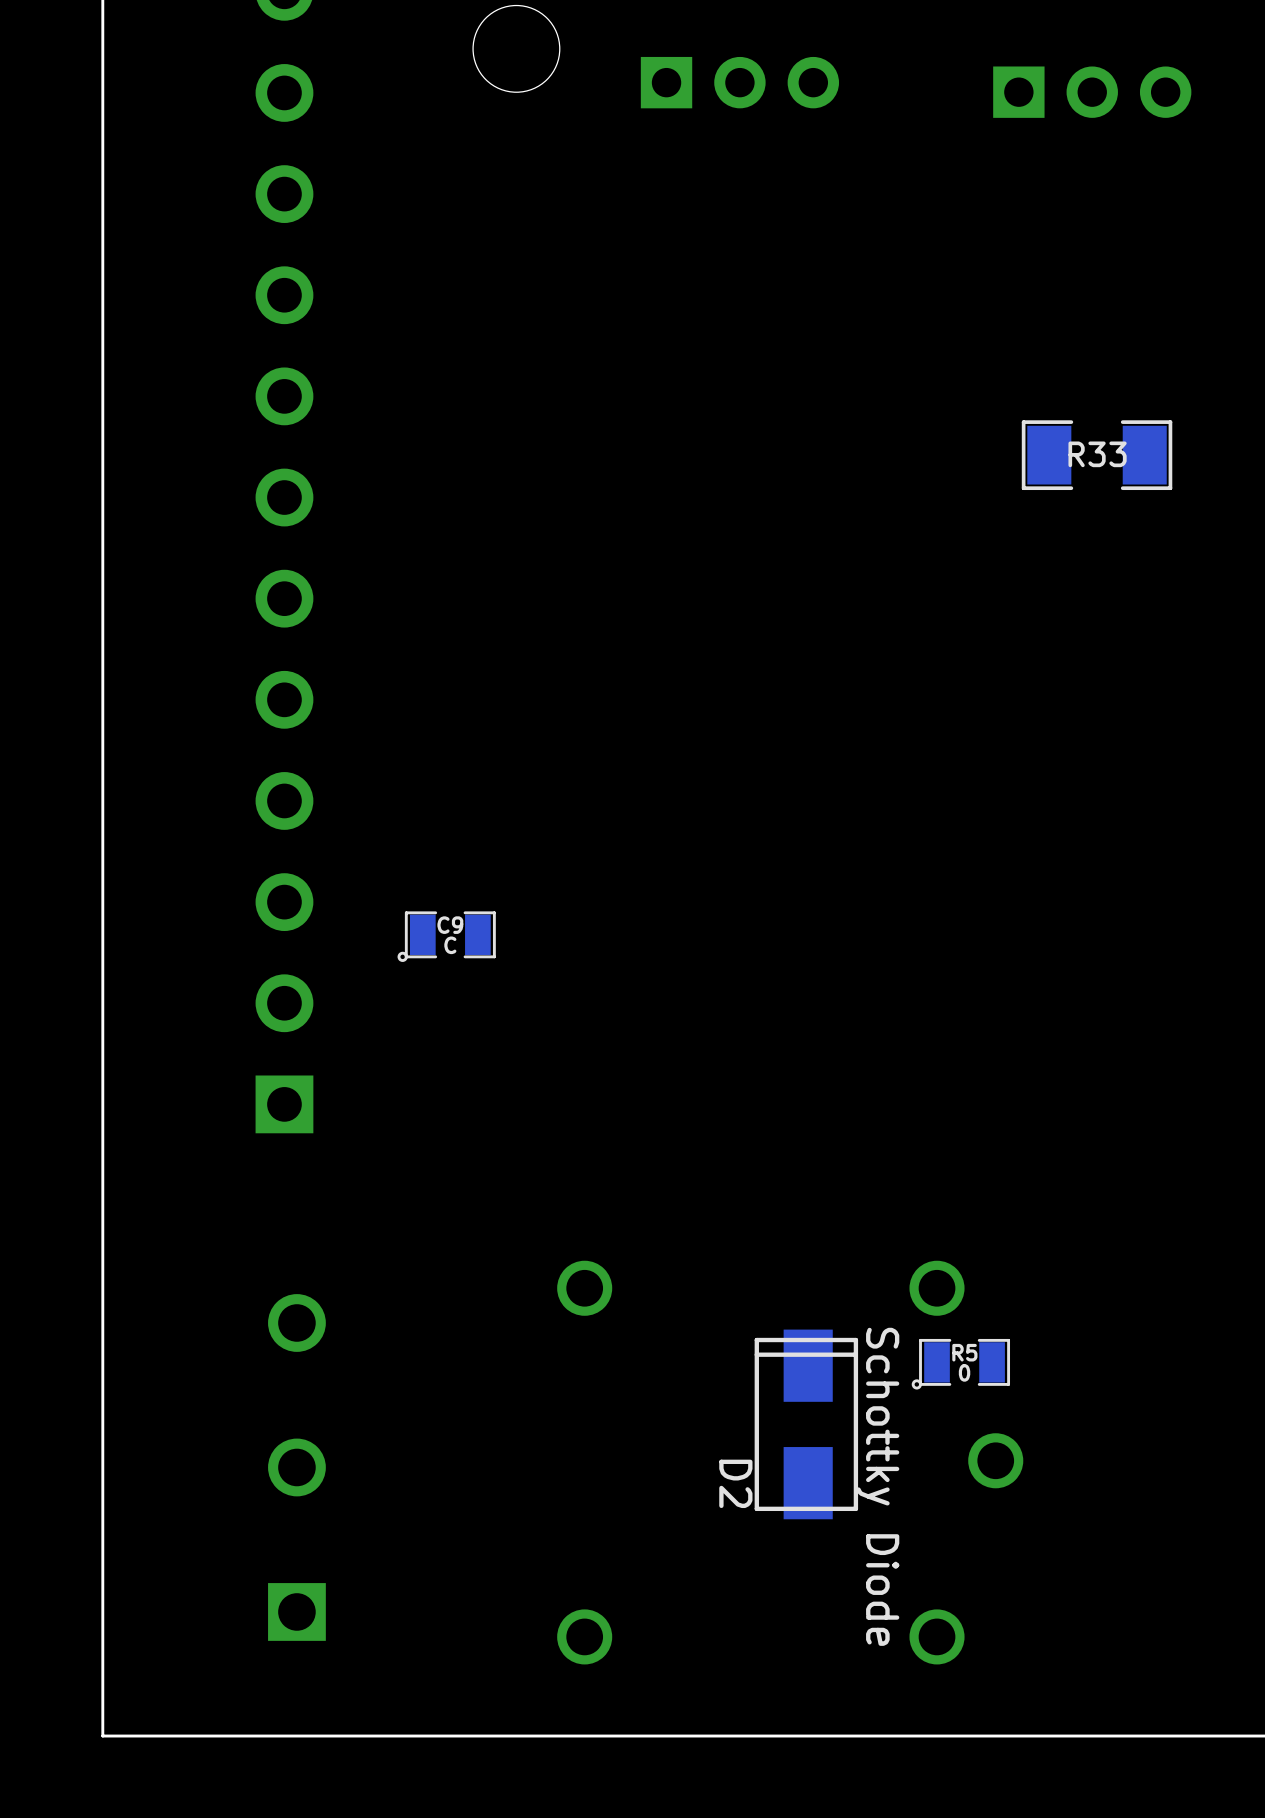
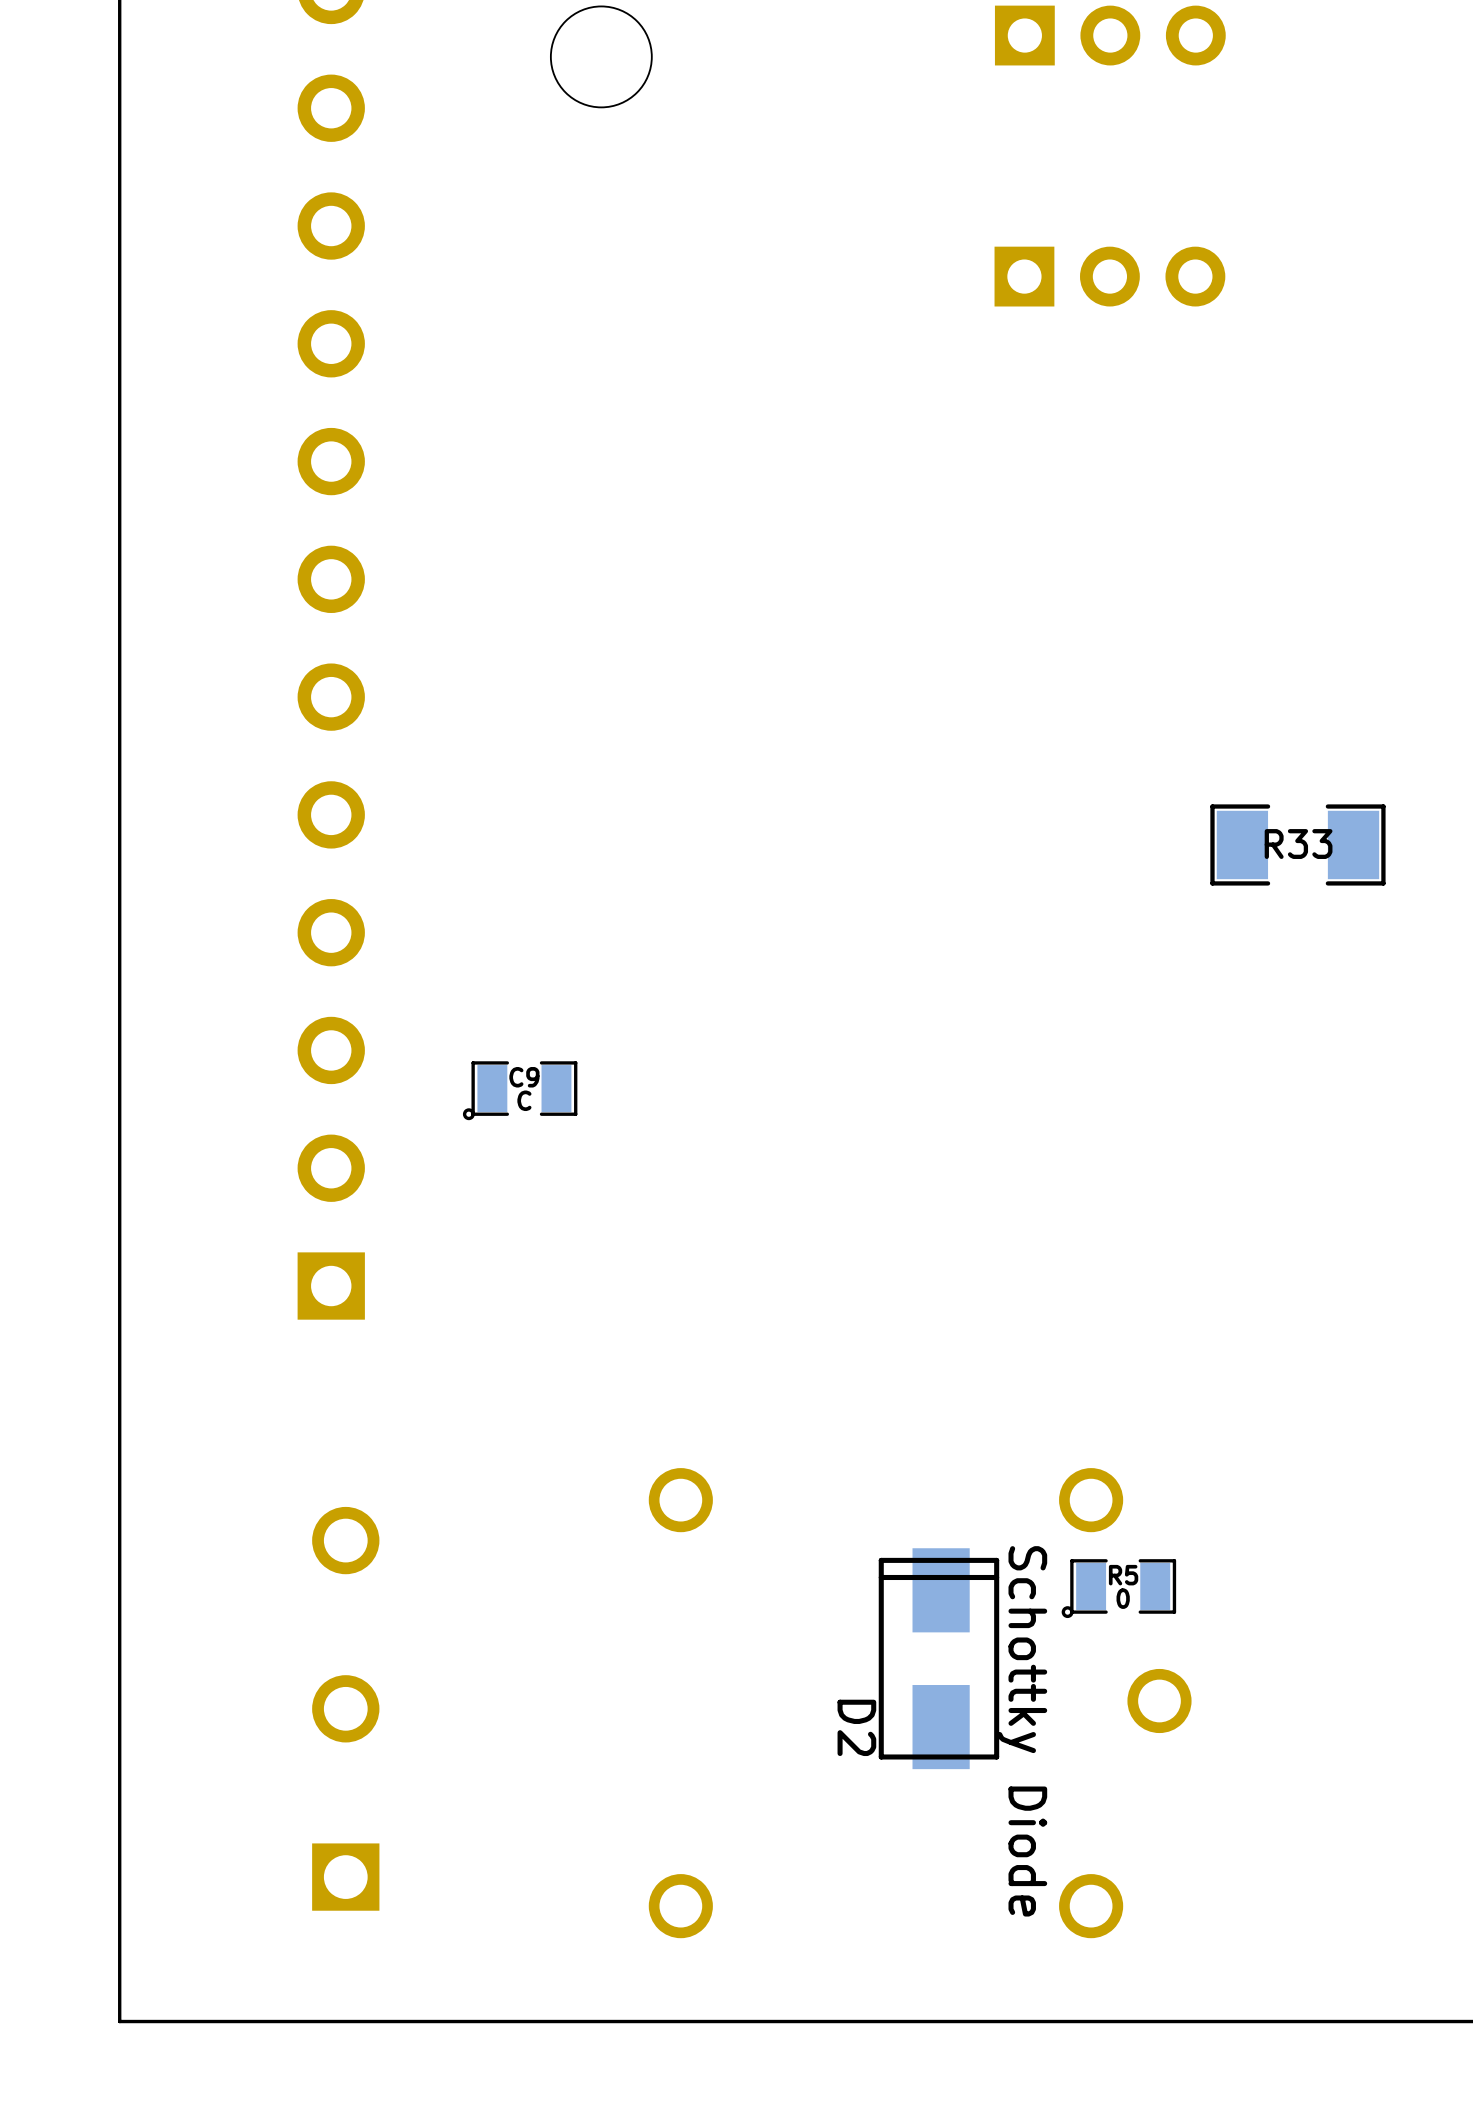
part: none -> (1110, 35)
part: (739, 82) -> none
part: (1092, 92) -> none
part: none -> (1109, 276)
R33 position: (1097, 455) -> (1297, 844)

